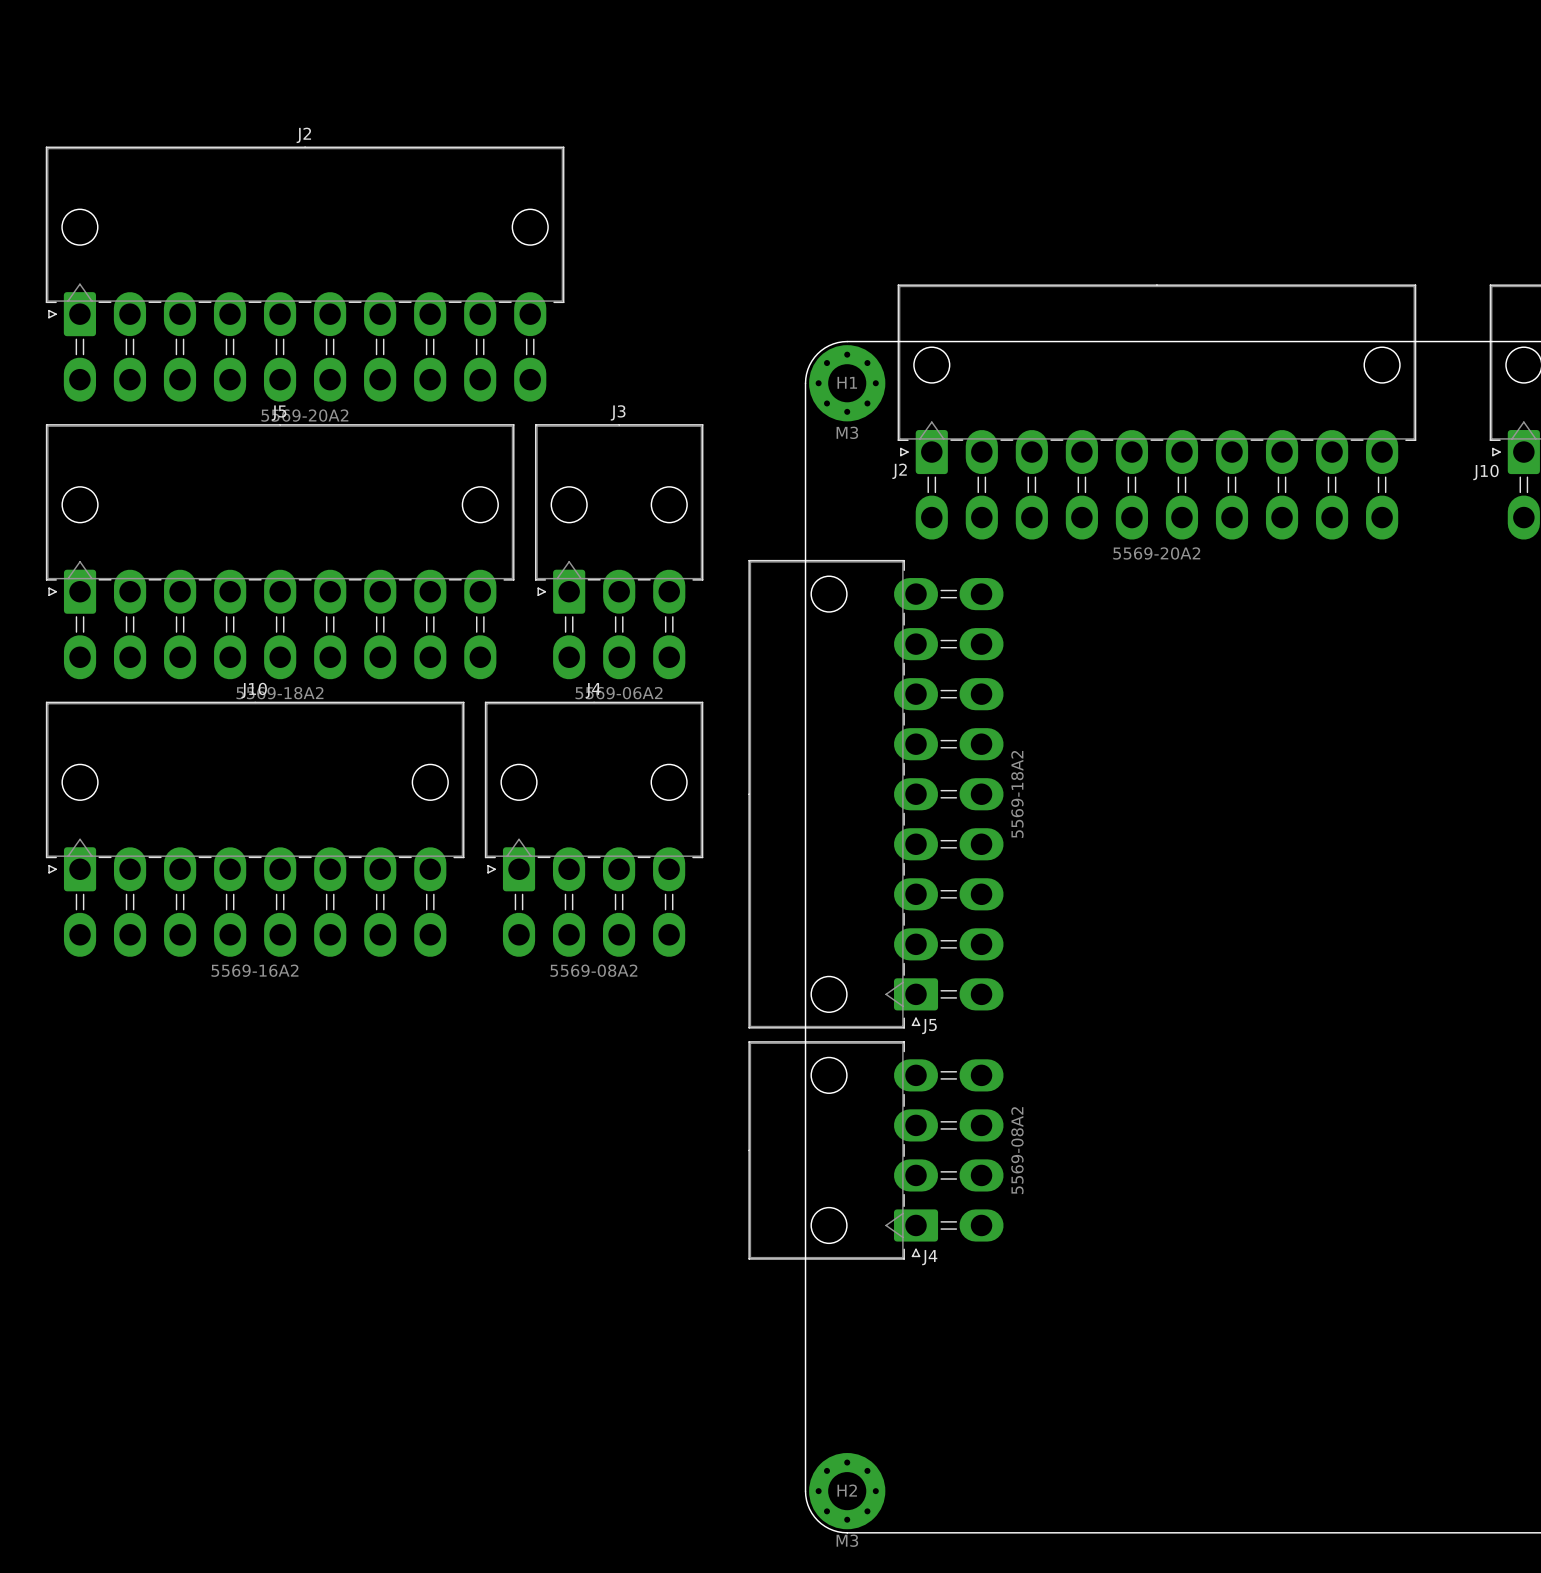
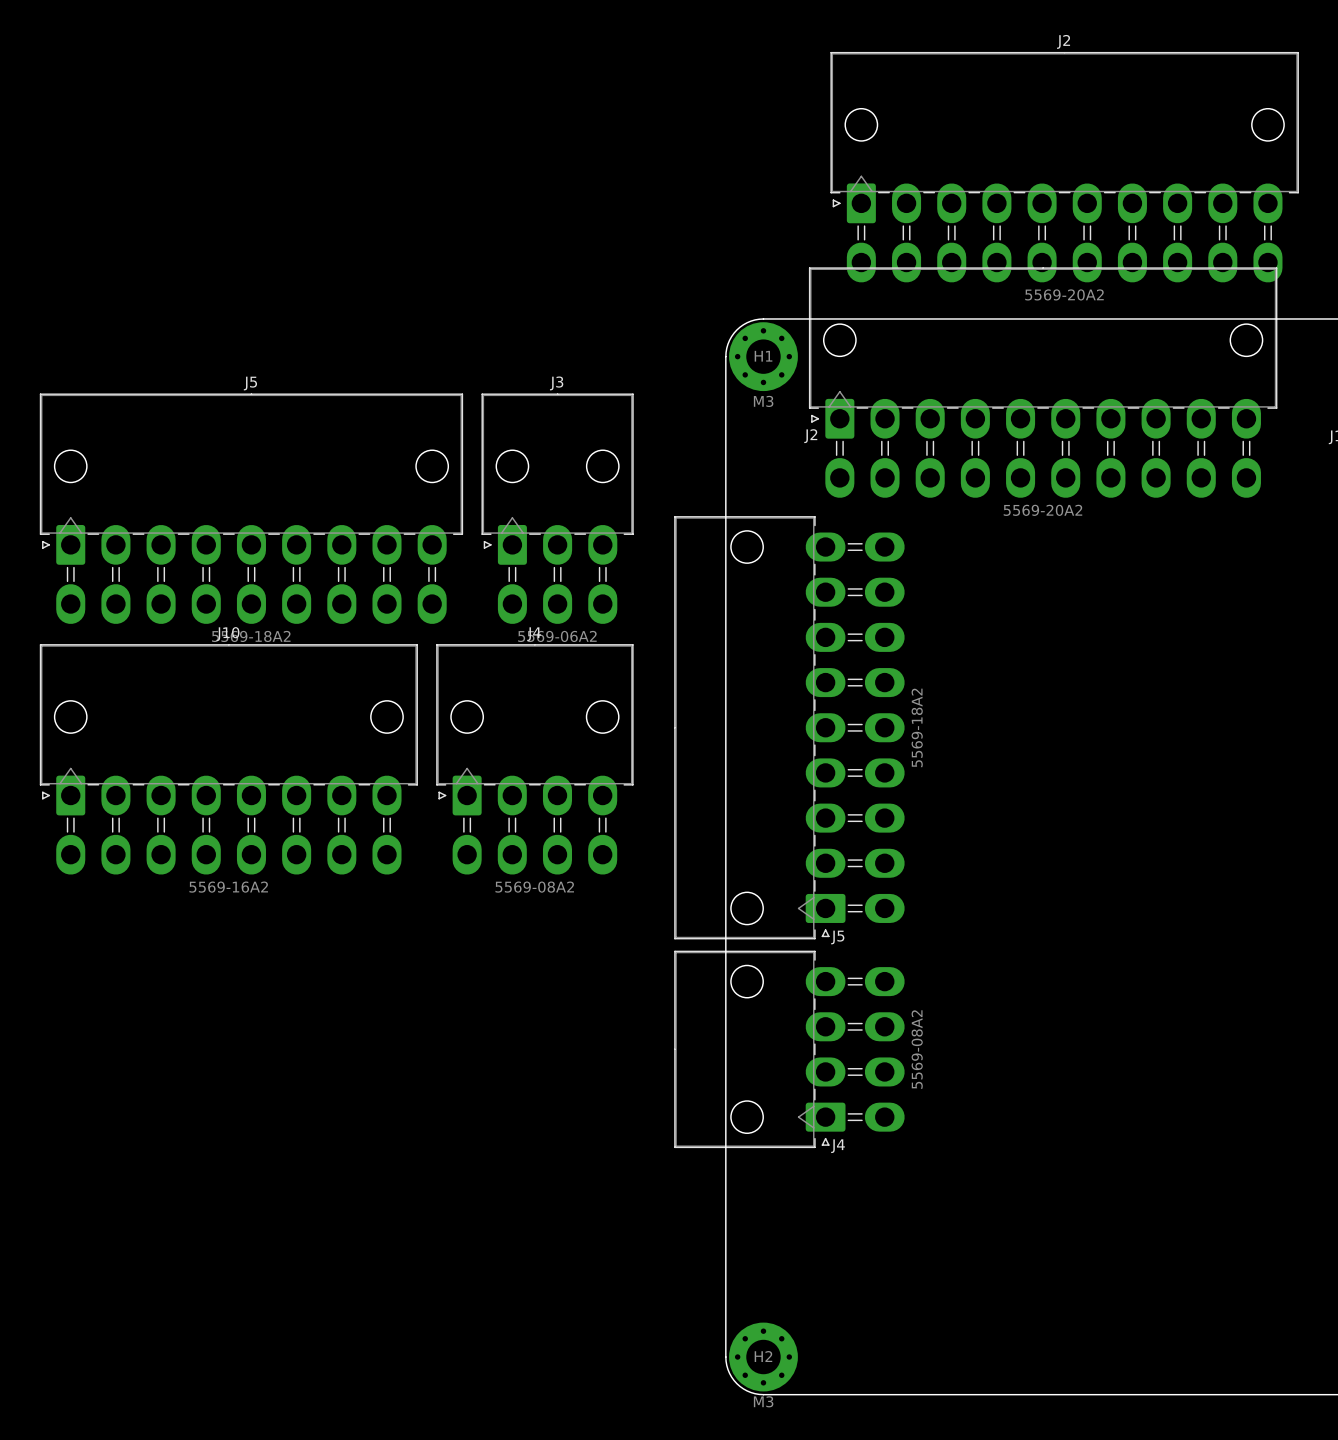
J2: none -> 5569-20A2 (1064, 167)
J2: 5569-20A2 (305, 274) -> none

